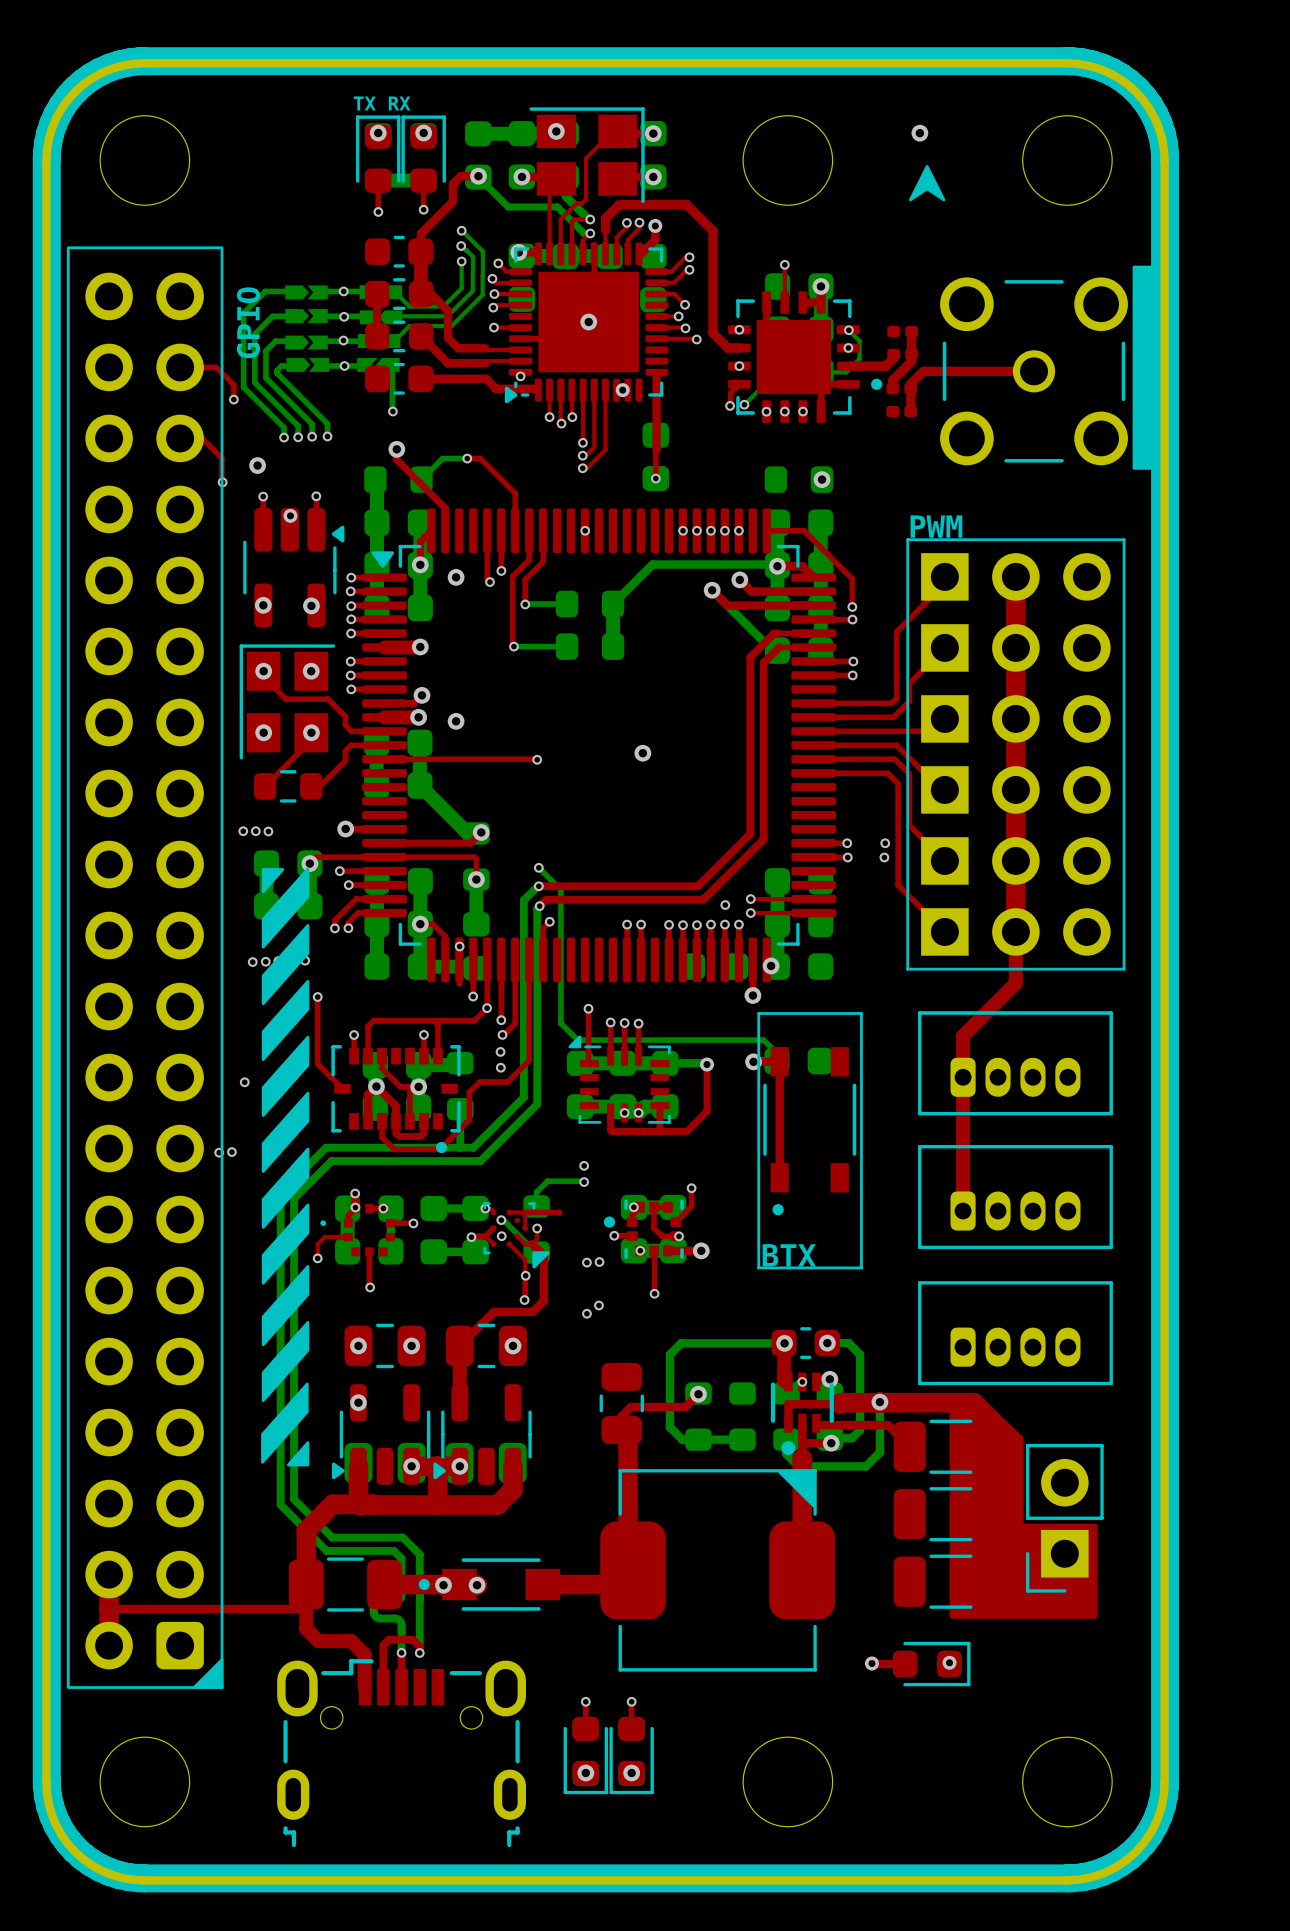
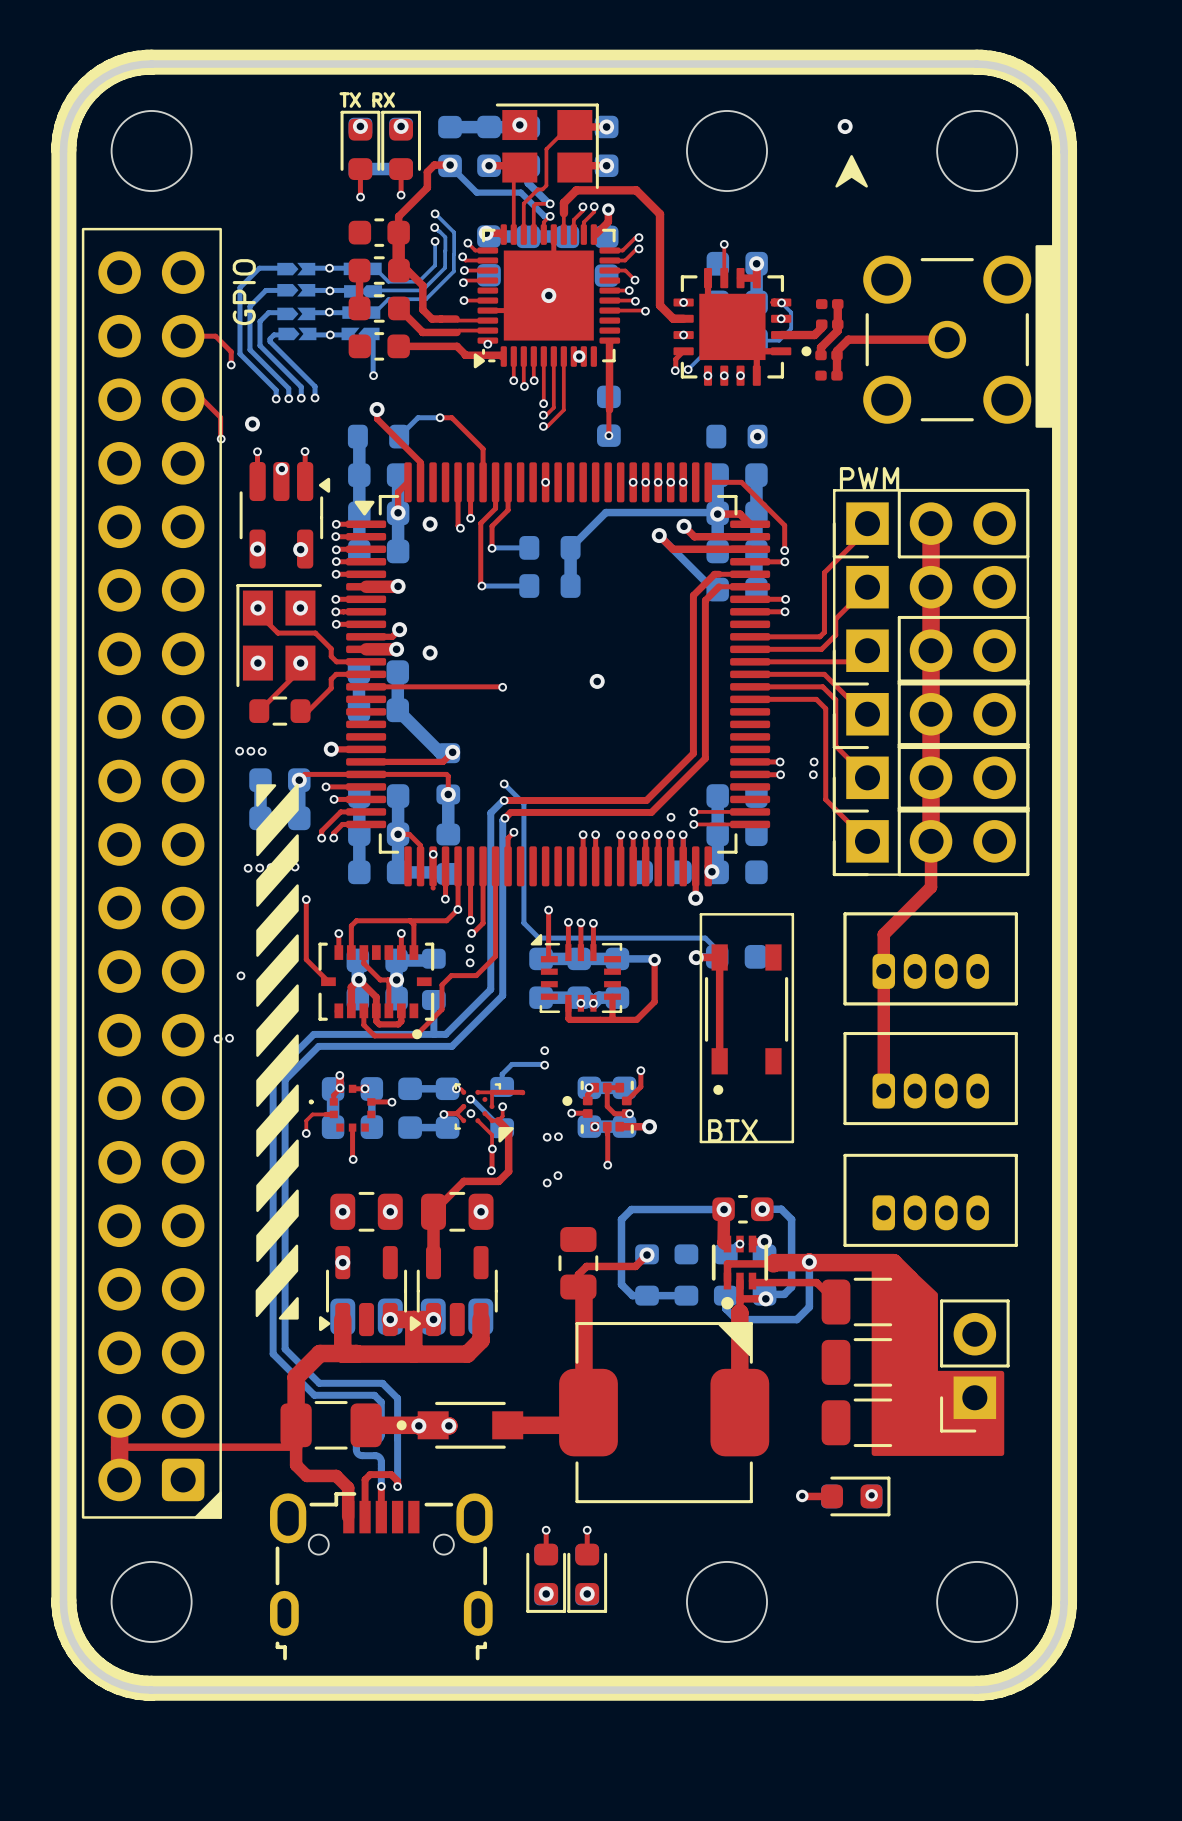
part footprint: [921, 553, 1111, 601] -> [832, 488, 1030, 559]
part footprint: [921, 695, 1111, 743] -> [832, 615, 1030, 686]
part footprint: [921, 766, 1111, 814] -> [832, 679, 1030, 750]
part footprint: [921, 837, 1111, 885] -> [832, 743, 1030, 813]
part footprint: [921, 908, 1111, 956] -> [832, 806, 1030, 877]

